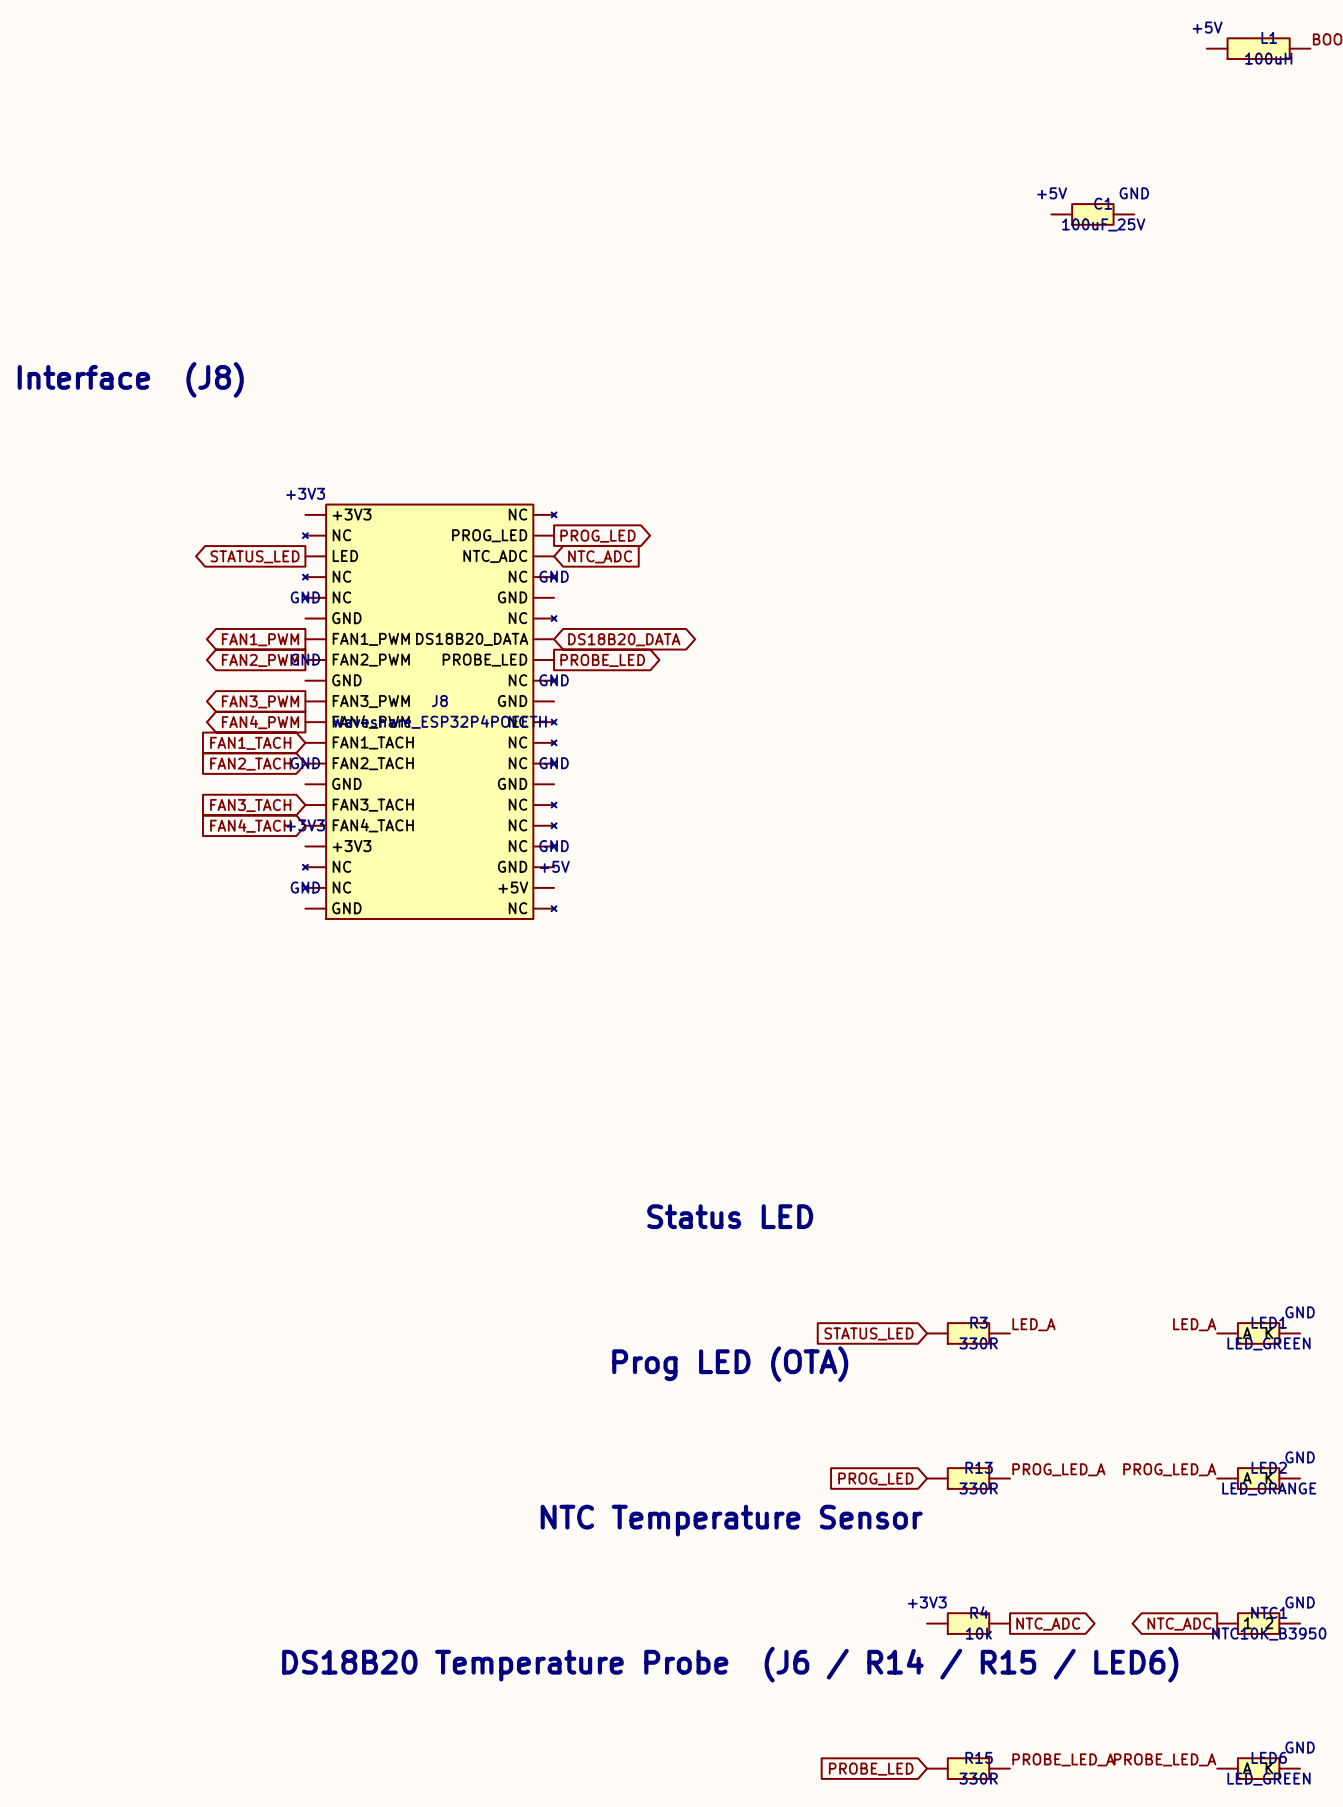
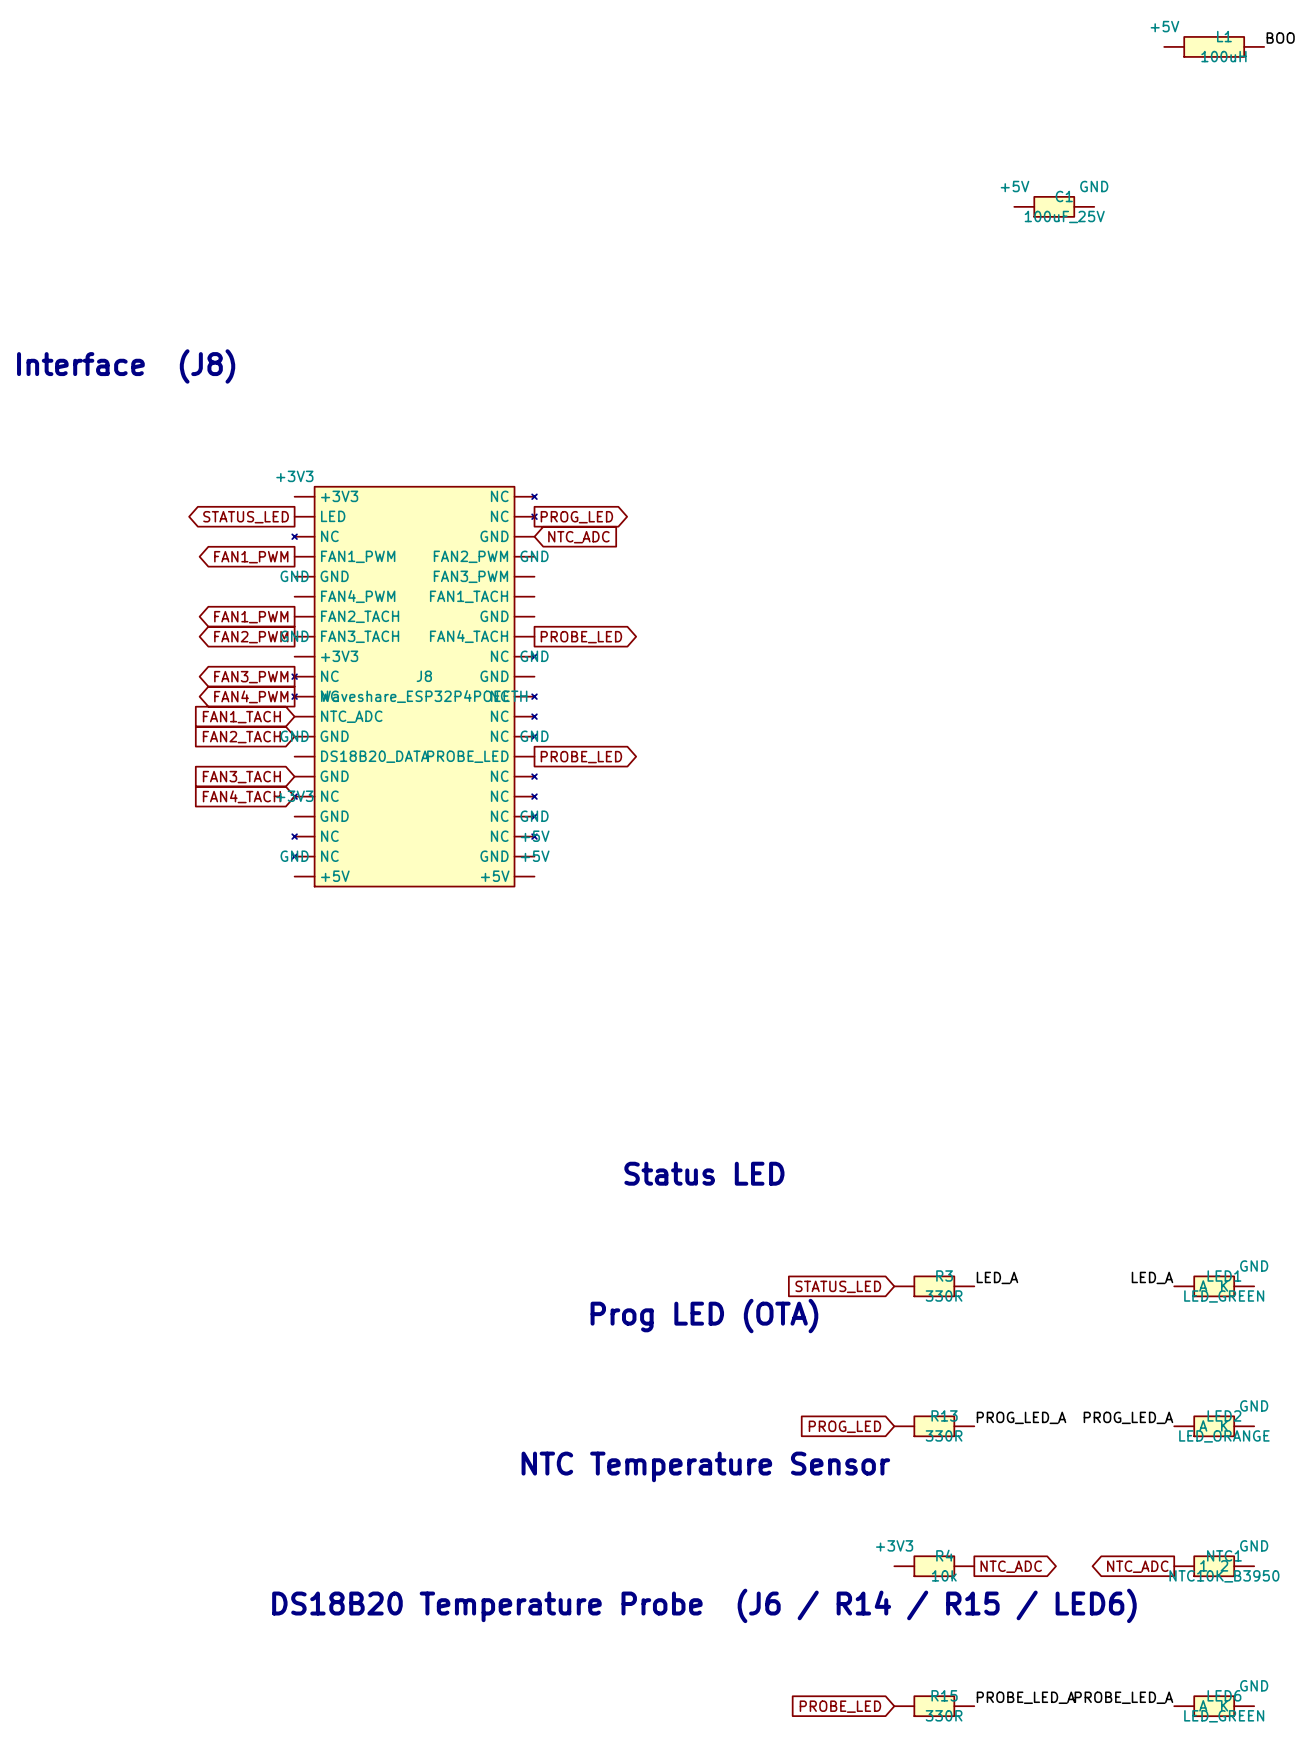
J8 symbol: [302, 504, 557, 920] -> [292, 486, 537, 887]
global label position: STATUS_LED (255, 556) -> STATUS_LED (246, 517)
global label: none -> FAN1_PWM (251, 557)
global label: DS18B20_DATA (624, 639) -> none
global label: none -> PROBE_LED (581, 757)
power symbol: none -> +5V (535, 856)

